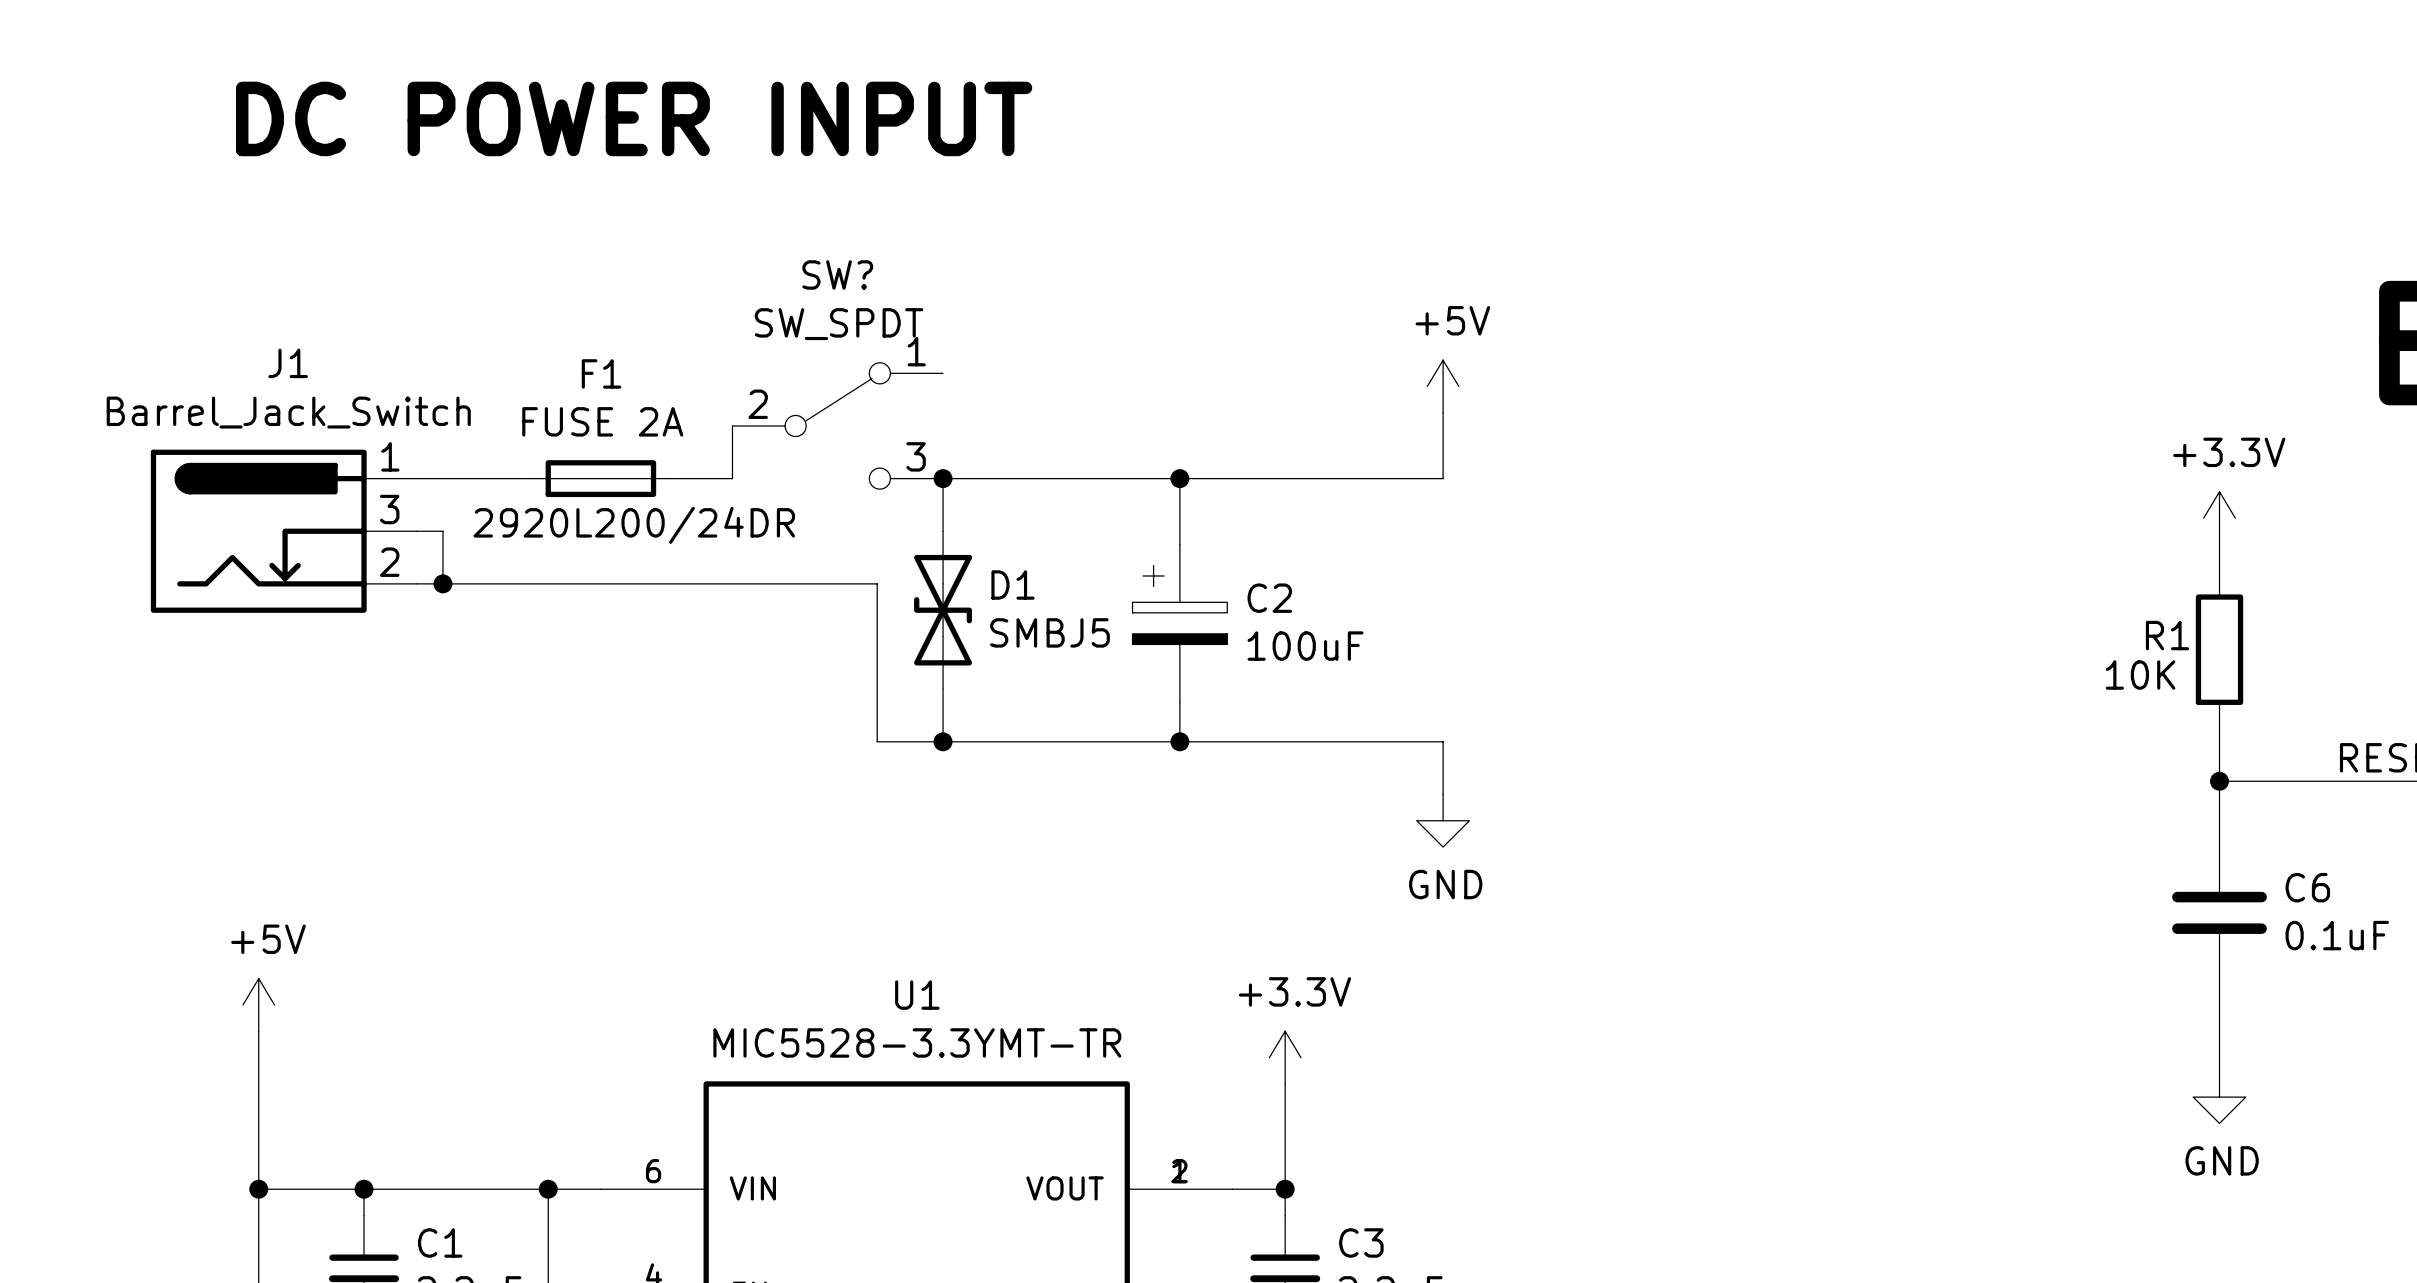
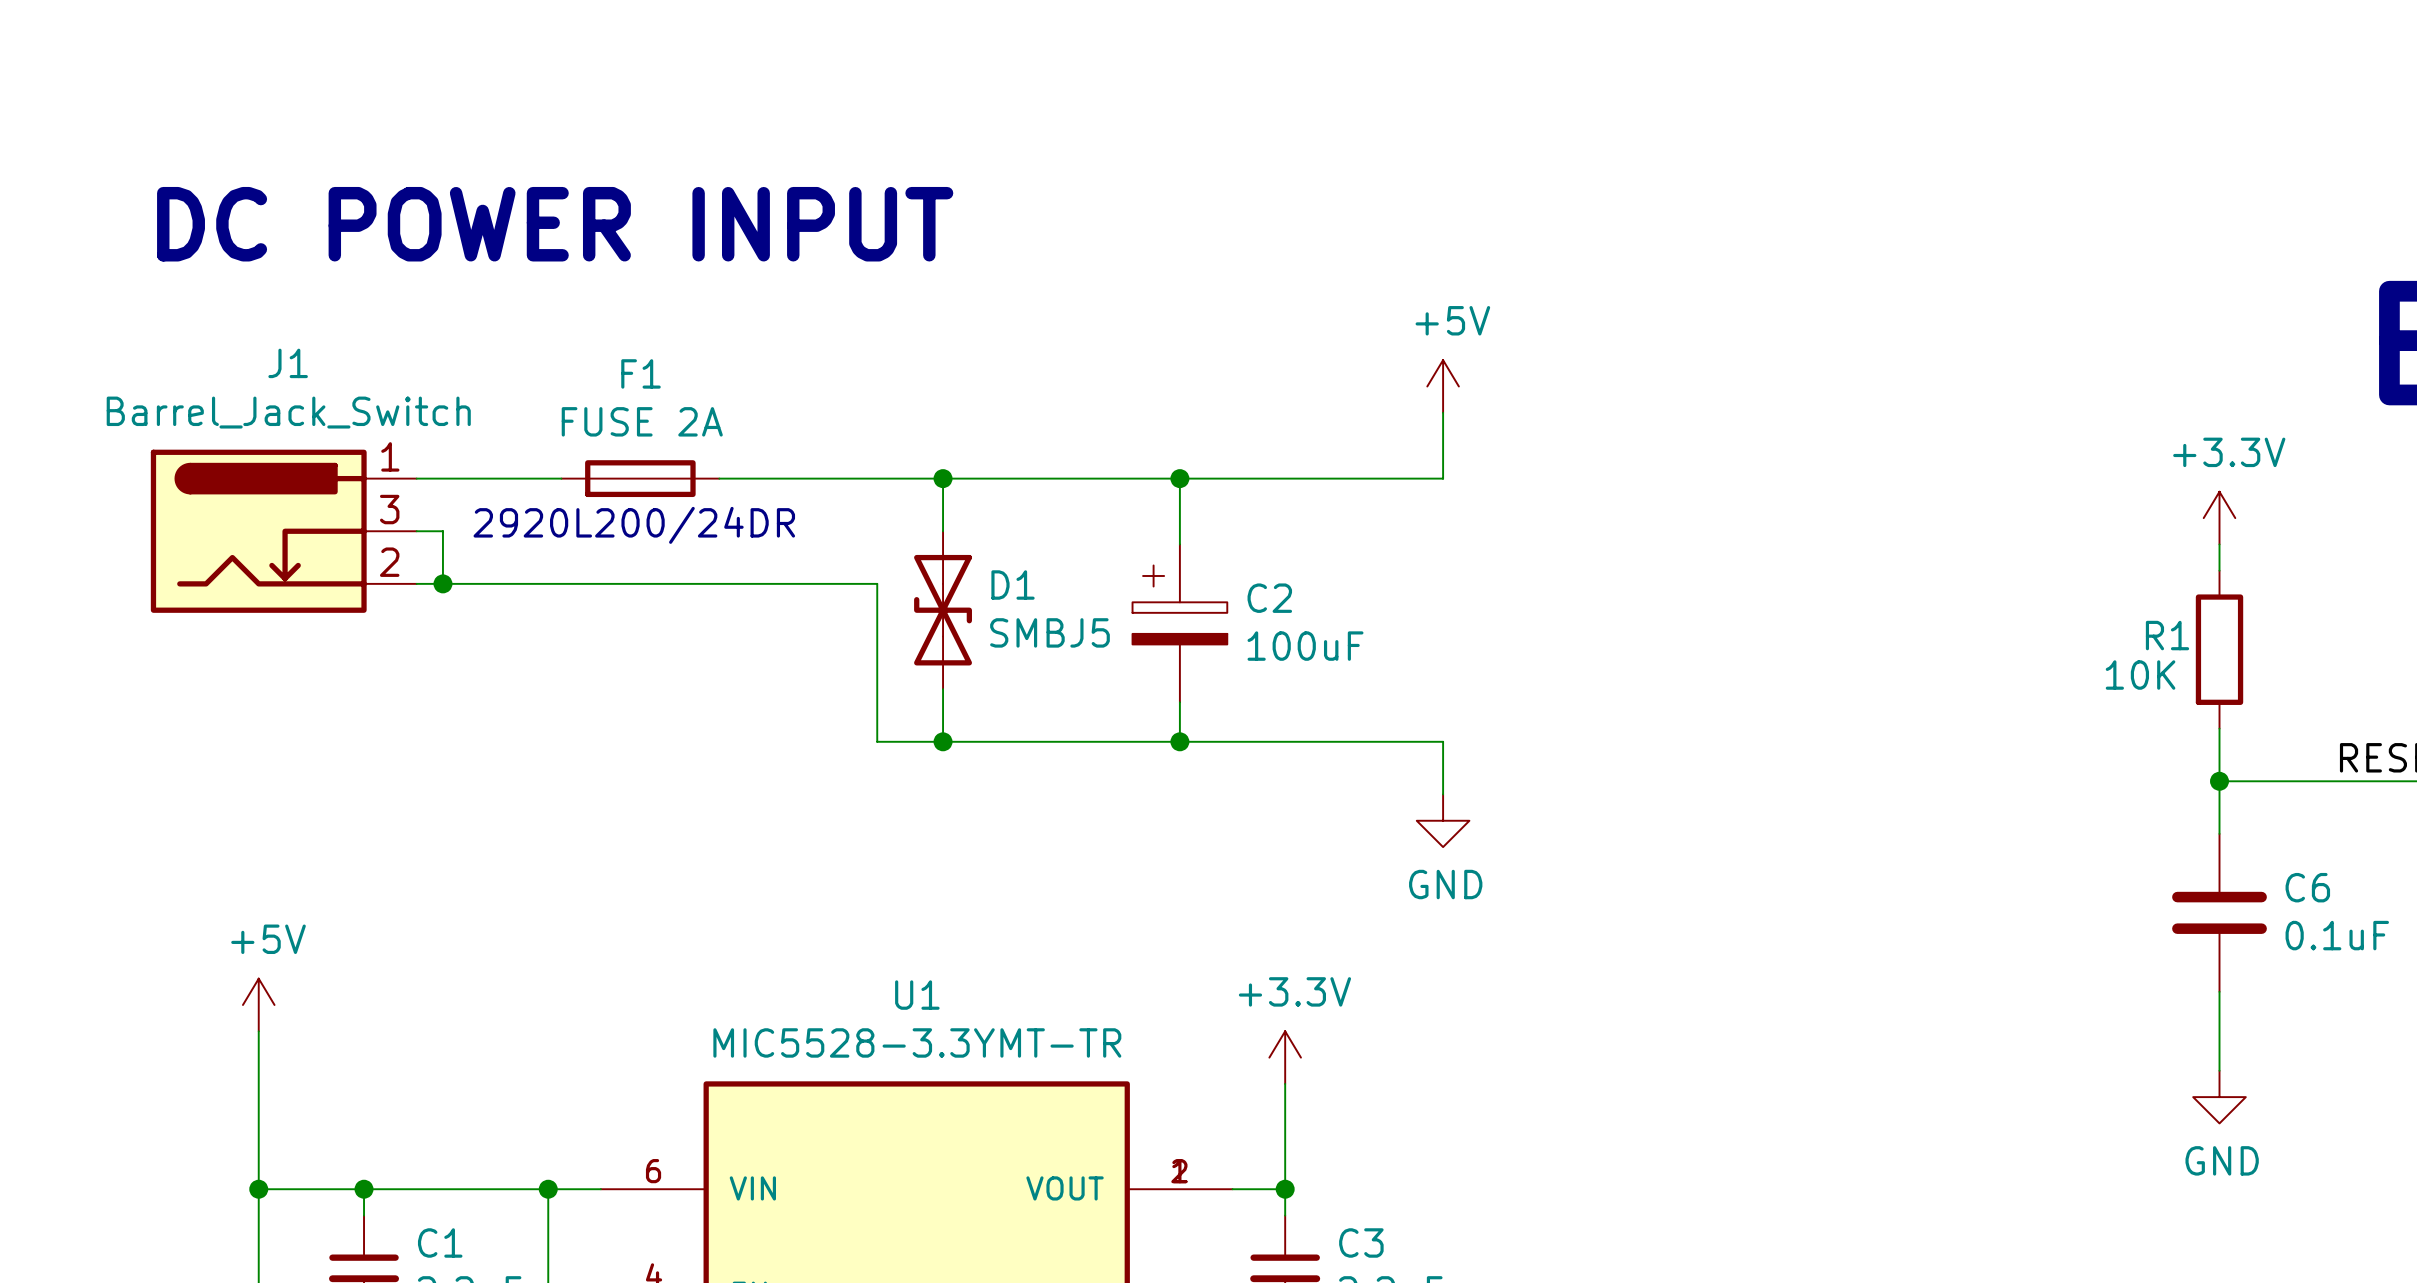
text position: DC POWER INPUT (634, 118) -> DC POWER INPUT (555, 224)
wire: (732, 425) (732, 478) -> (943, 478) (732, 478)
SW?: SW_SPDT (837, 425) -> none
F1 position: (600, 478) -> (640, 478)

